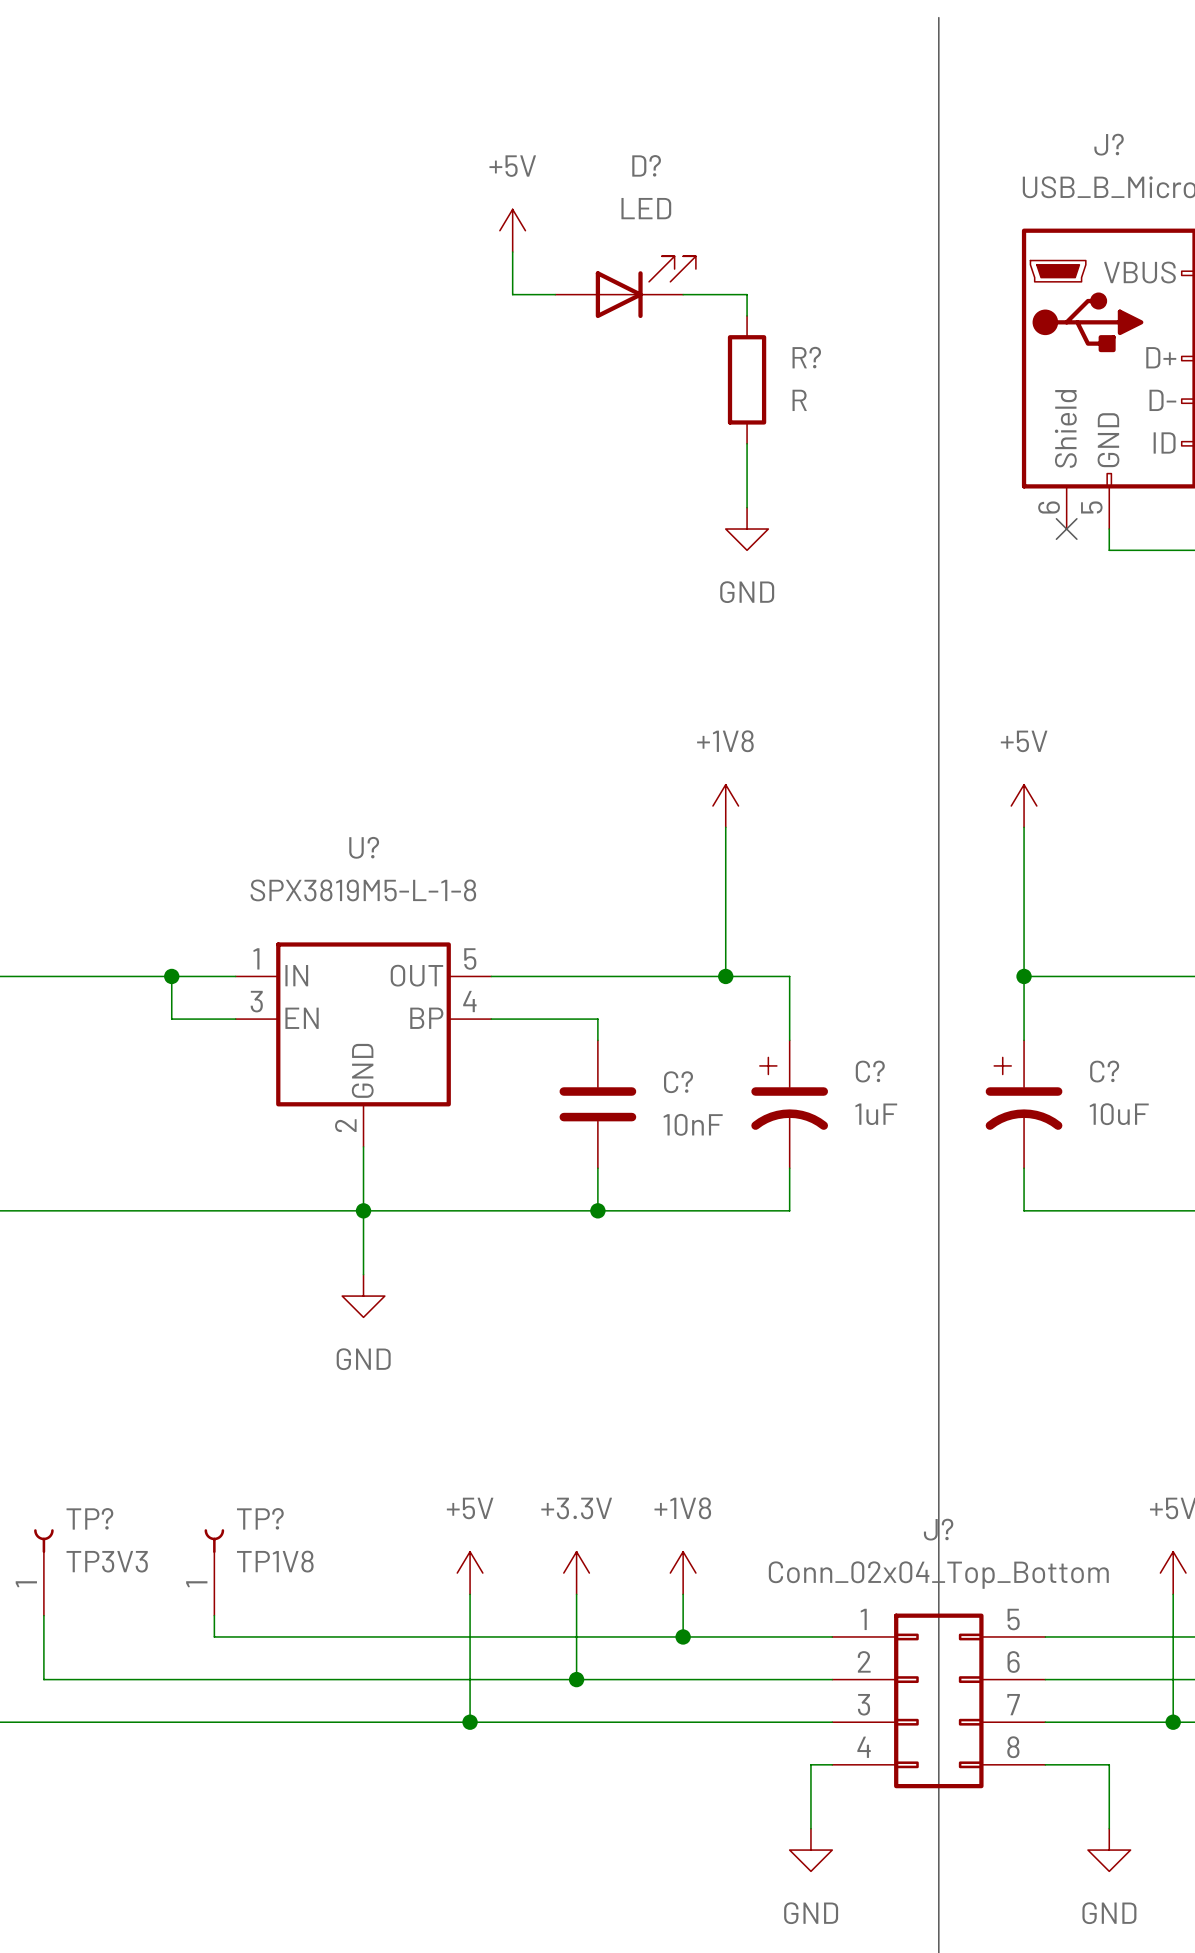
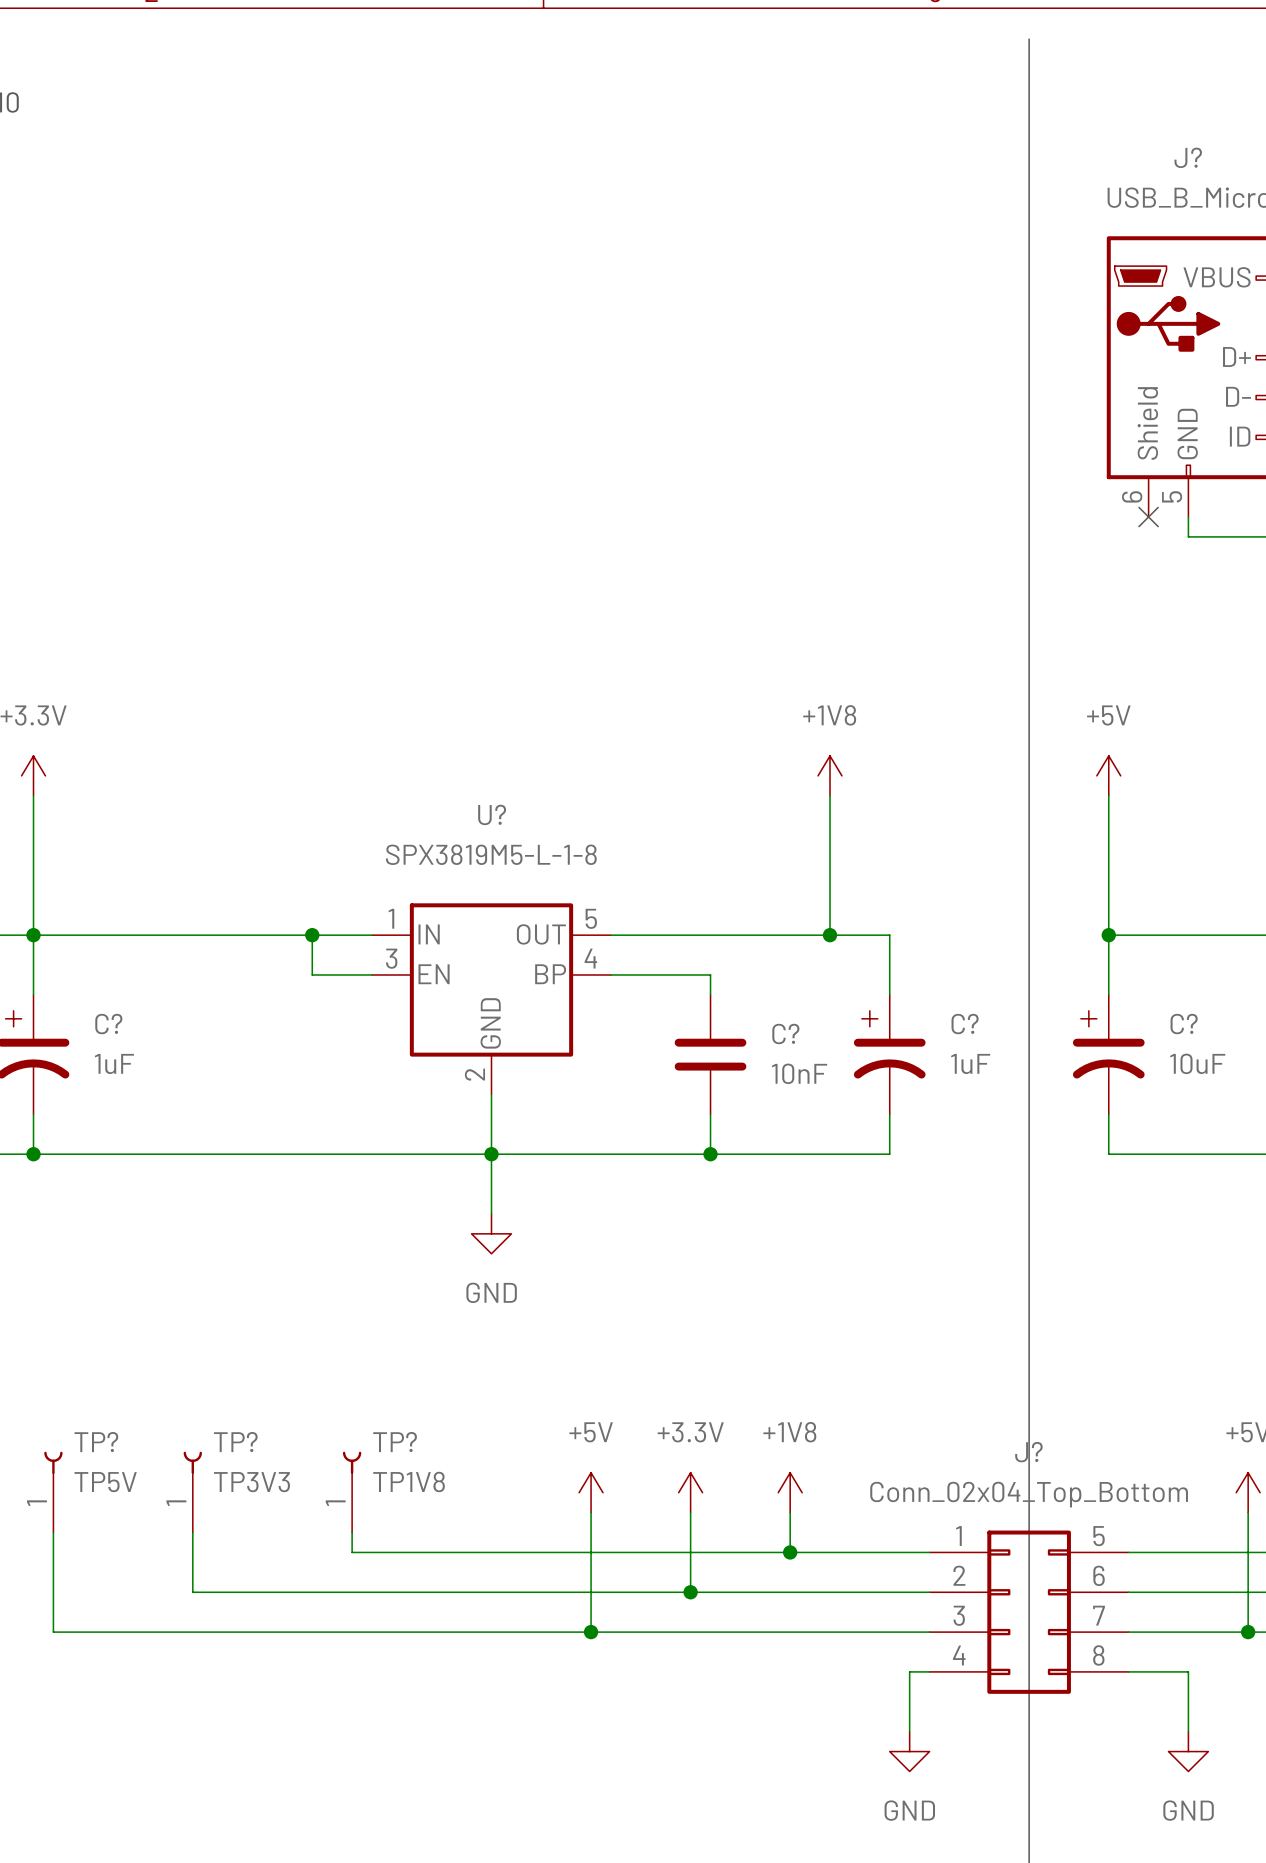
power symbol: +5V (512, 230) -> none
wire: (512, 252) (512, 294) (555, 294) -> none
D?: LED (625, 287) -> none
wire: (683, 294) (747, 294) (747, 315) -> none
R?: R (747, 379) -> none
wire: (747, 443) (747, 507) -> none
power symbol: GND (747, 529) -> none

